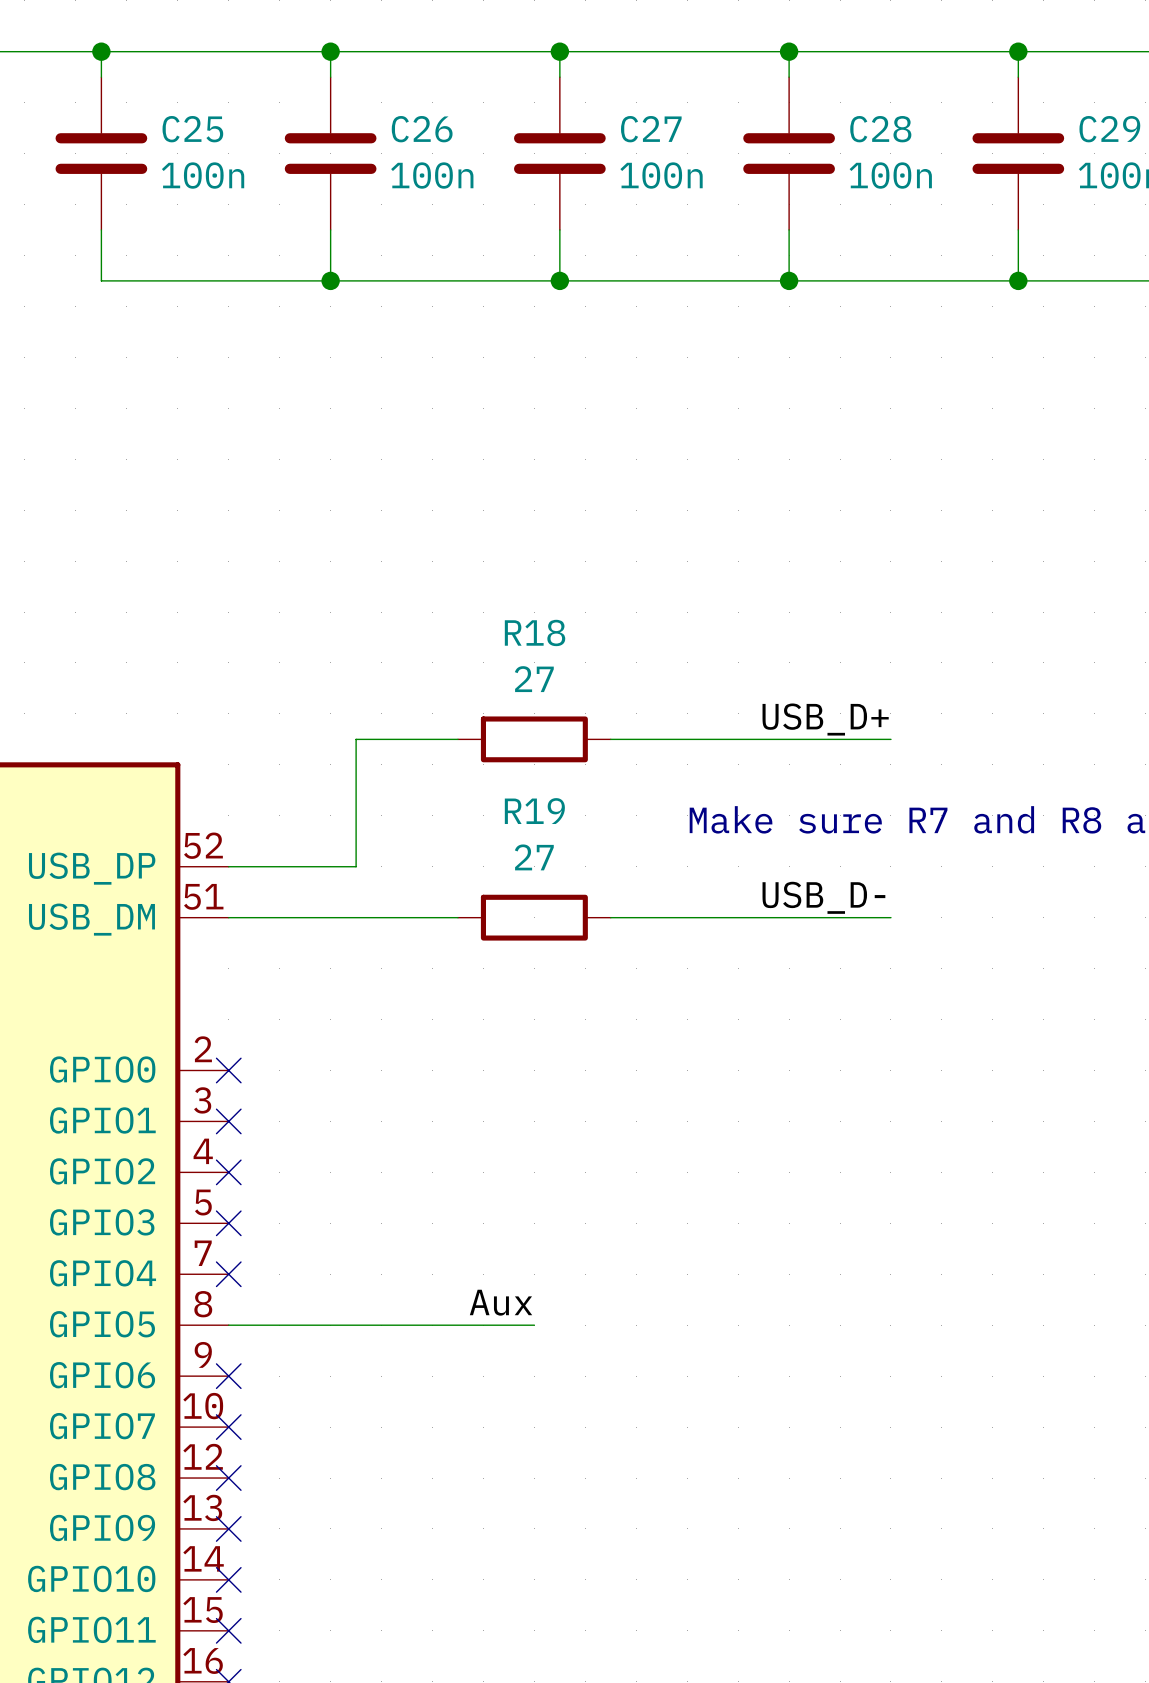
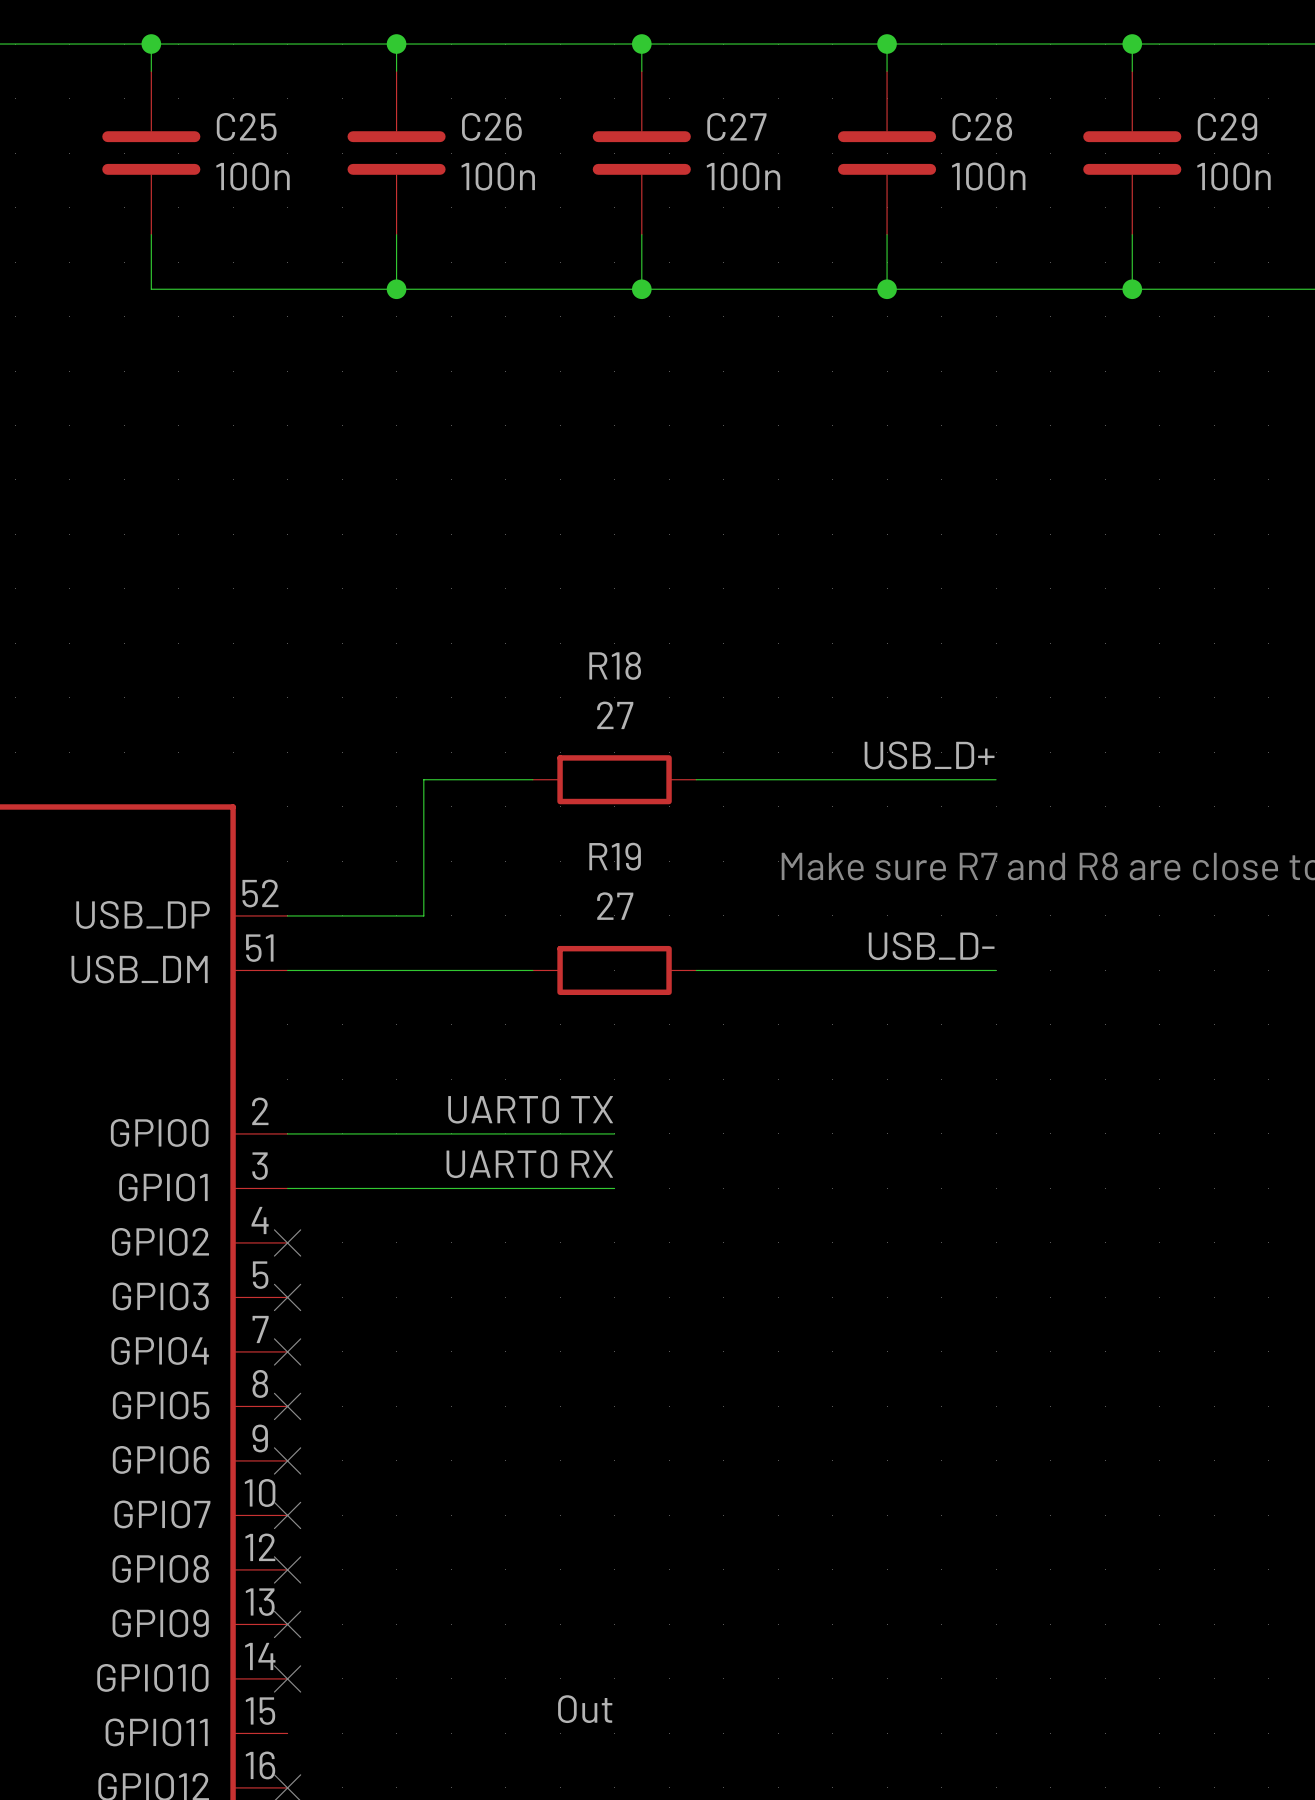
label: none -> UART0 TX (530, 1109)
wire: none -> (287, 1133) (614, 1133)
no-connect mark: (228, 1070) -> none
label: none -> UART0 RX (529, 1164)
no-connect mark: (228, 1121) -> none
label: Aux (501, 1302) -> none
wire: (228, 1325) (534, 1325) -> (287, 1188) (614, 1188)
no-connect mark: none -> (287, 1406)
label: none -> Out (585, 1709)
no-connect mark: (228, 1630) -> none

